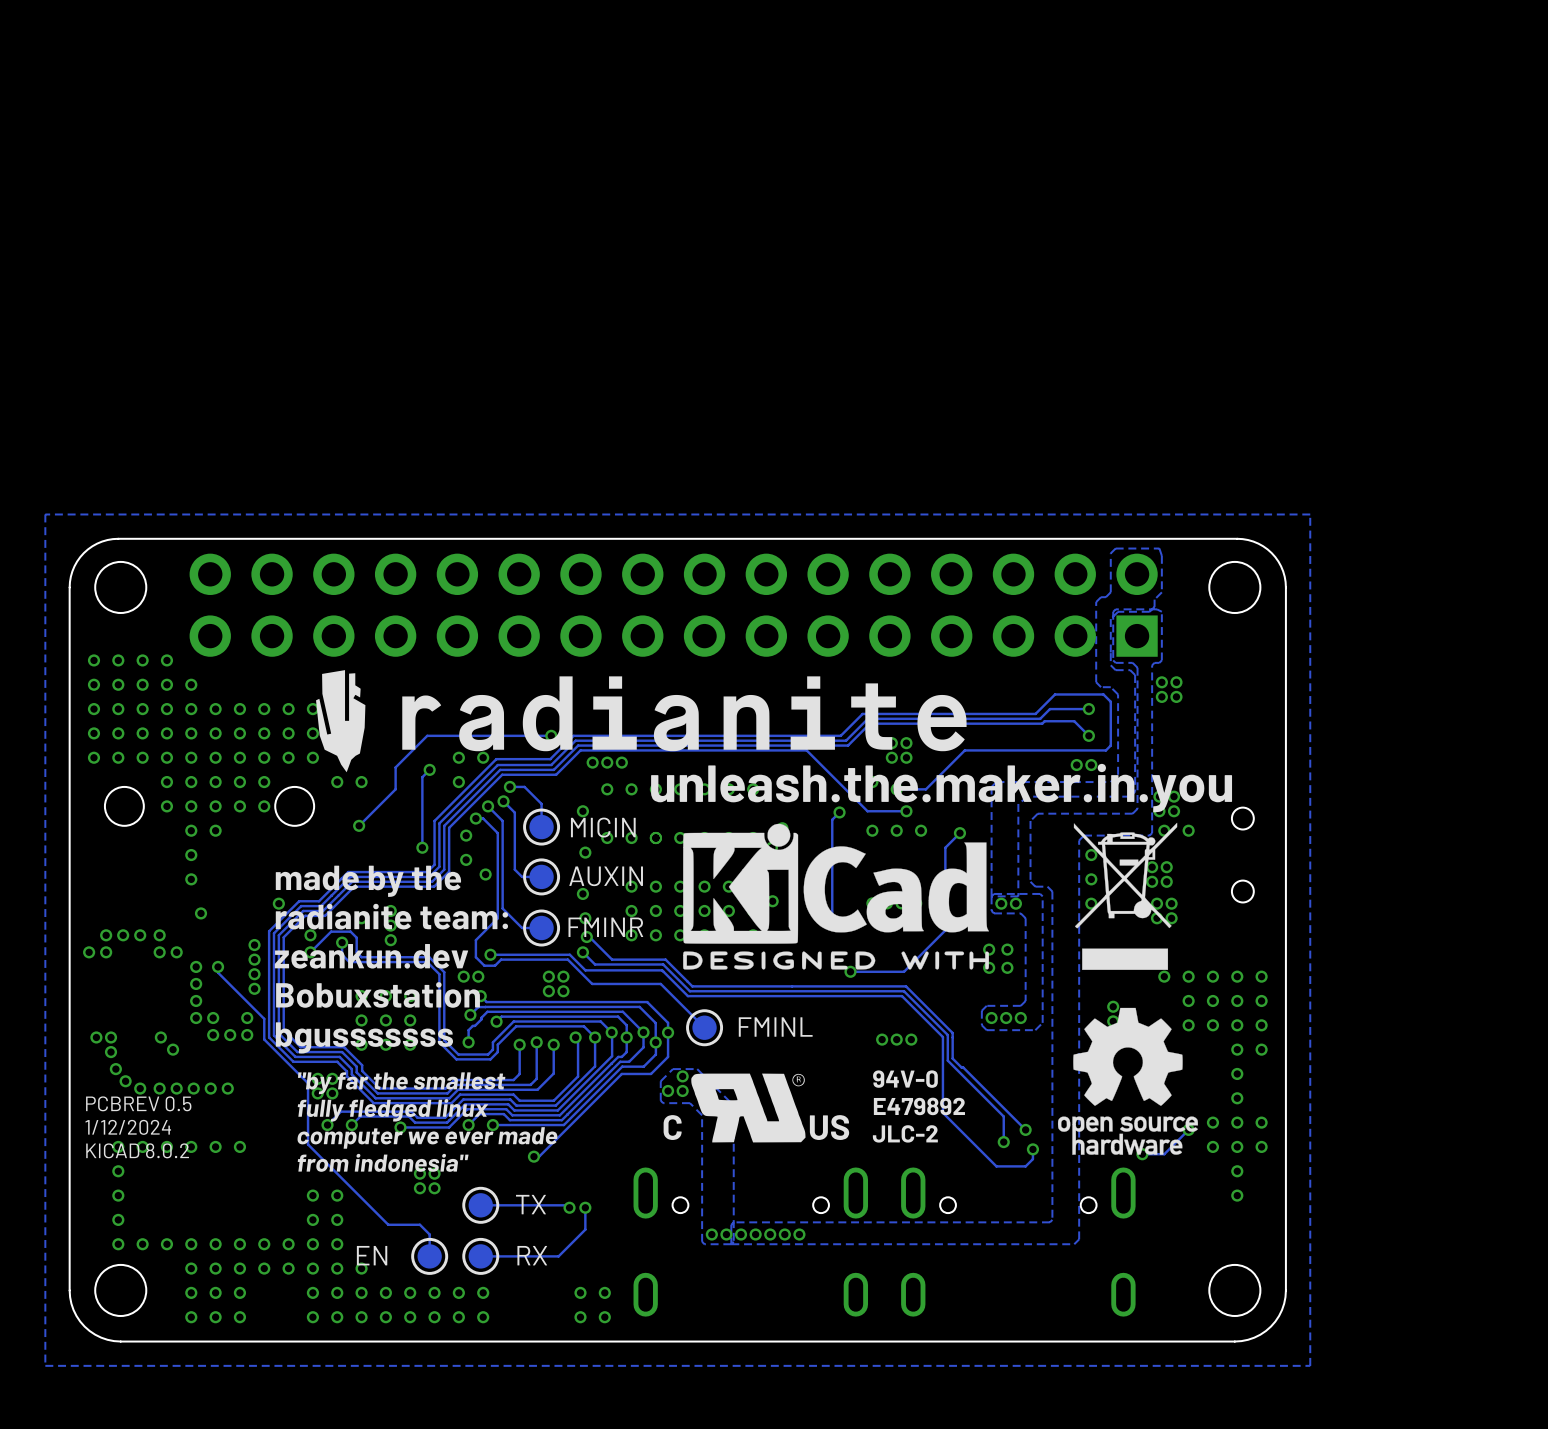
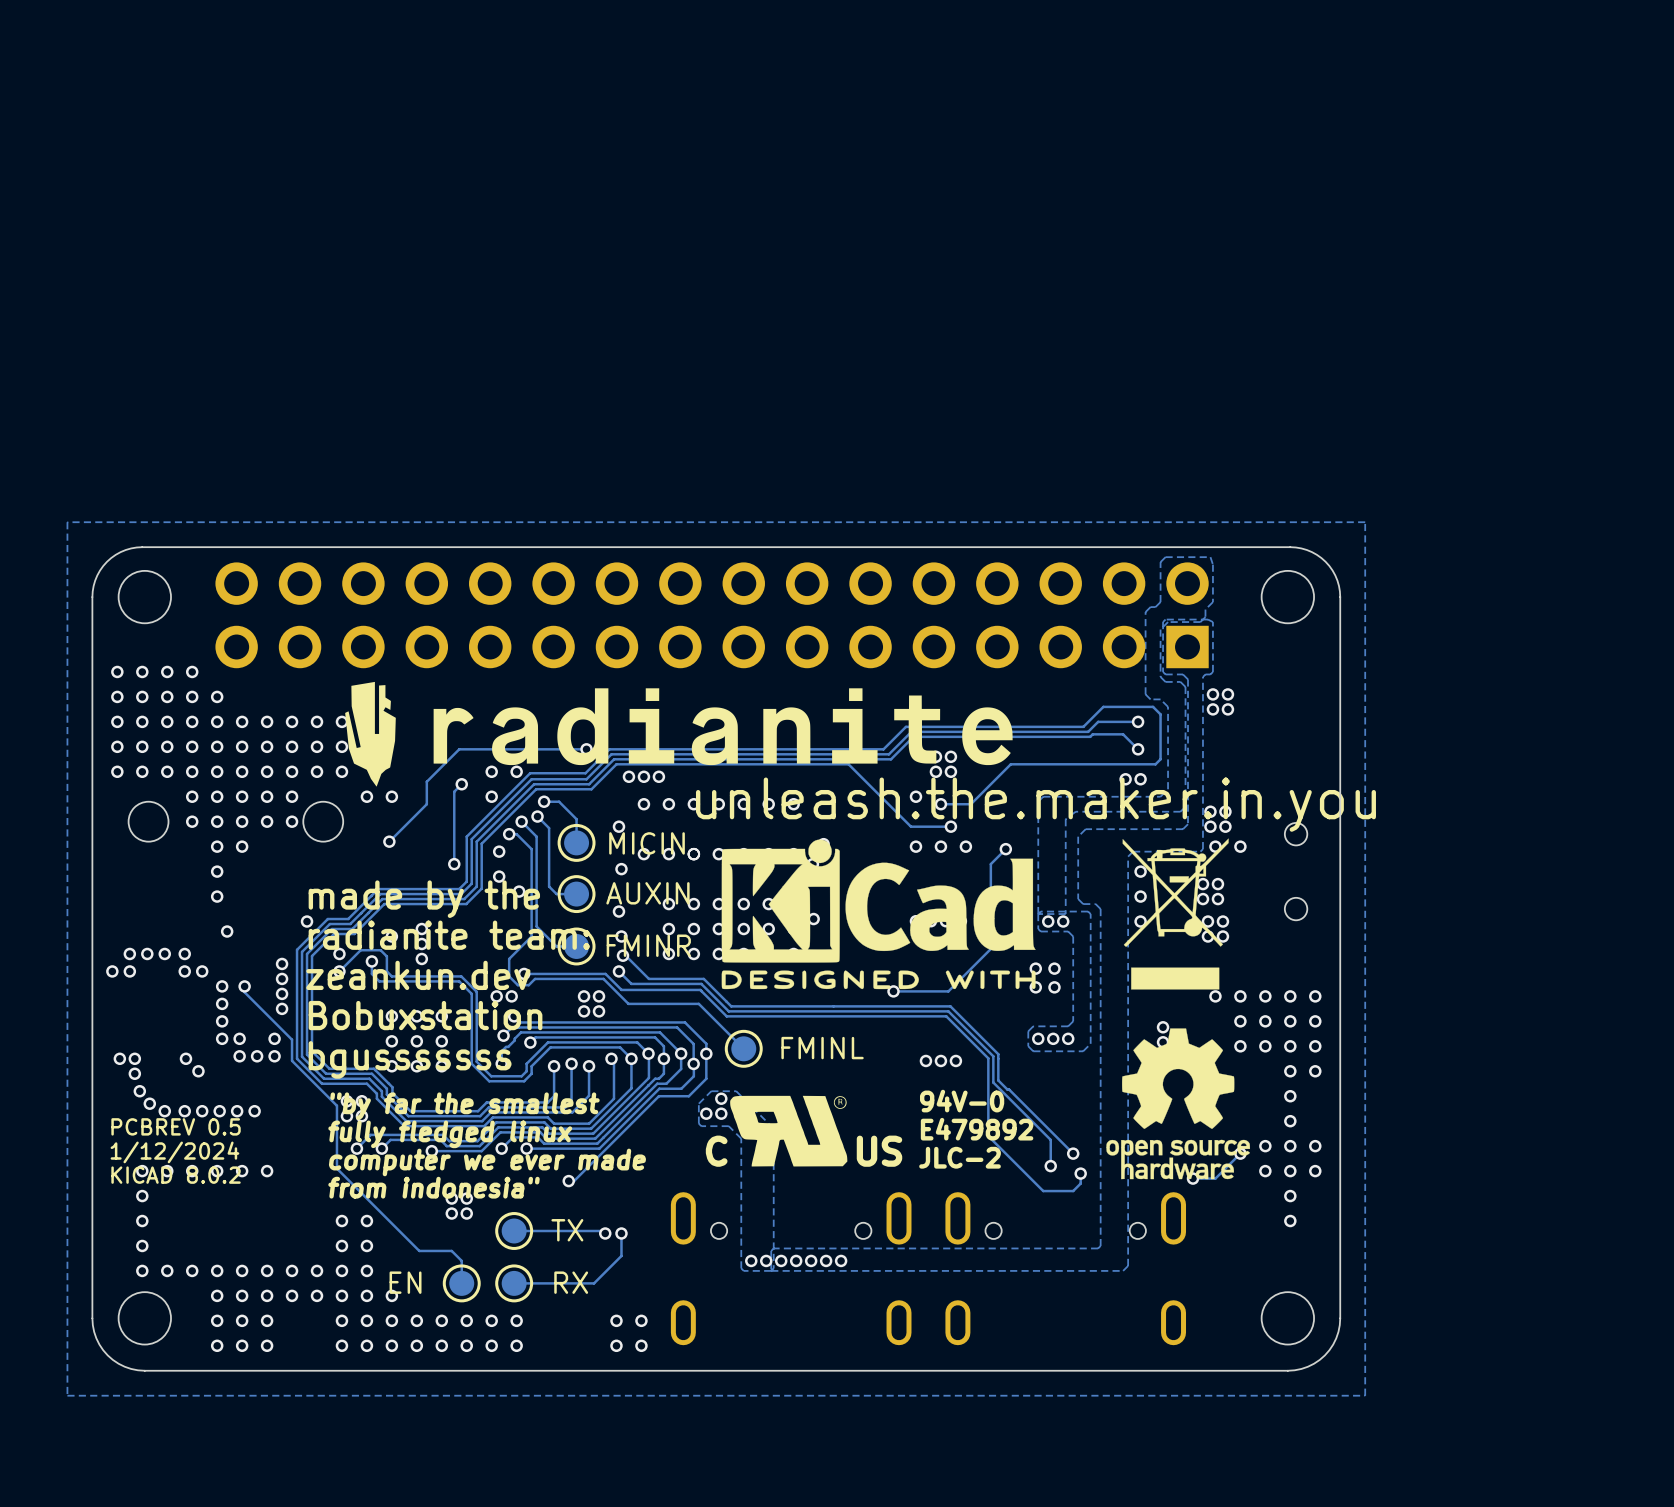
track: (839, 812) (832, 819) (832, 920) -> none
via: (839, 812) -> none

